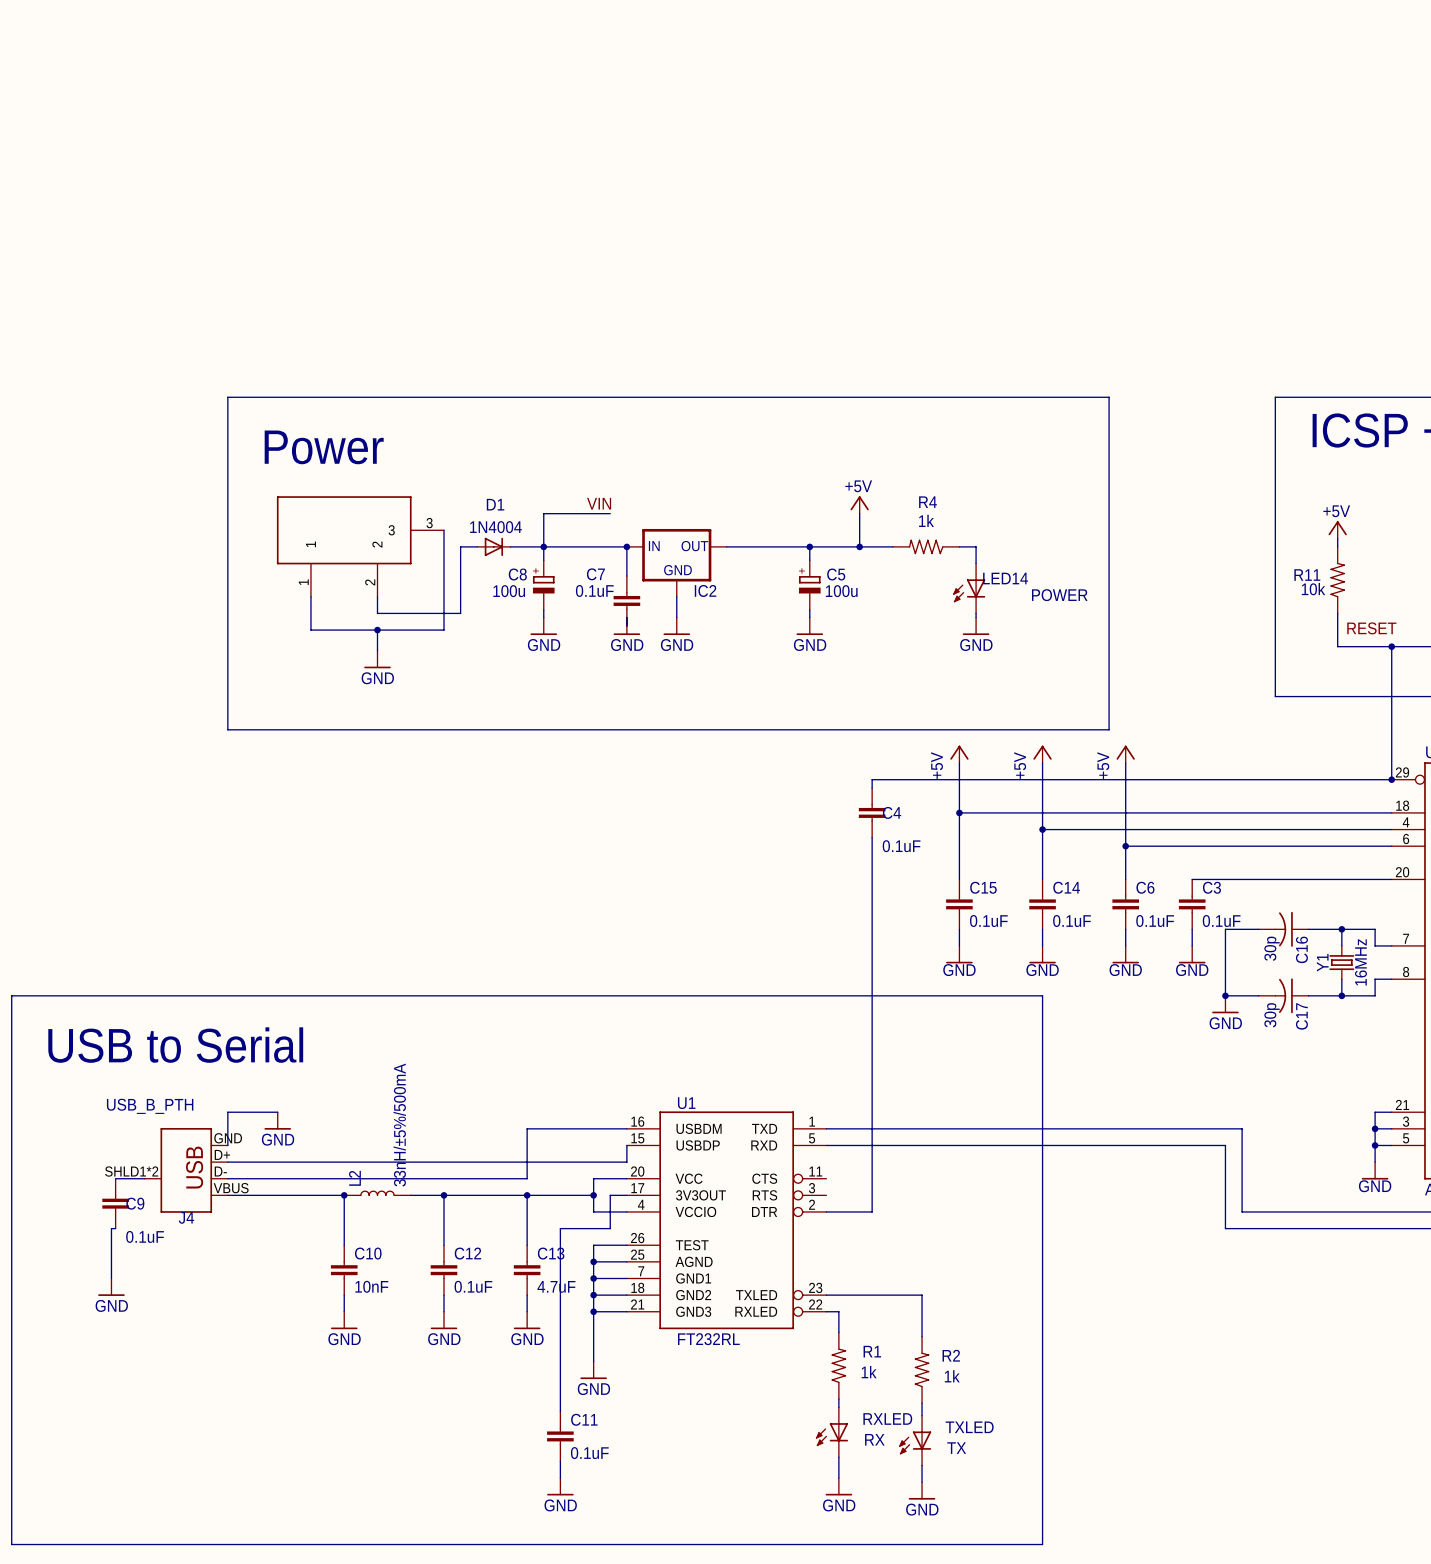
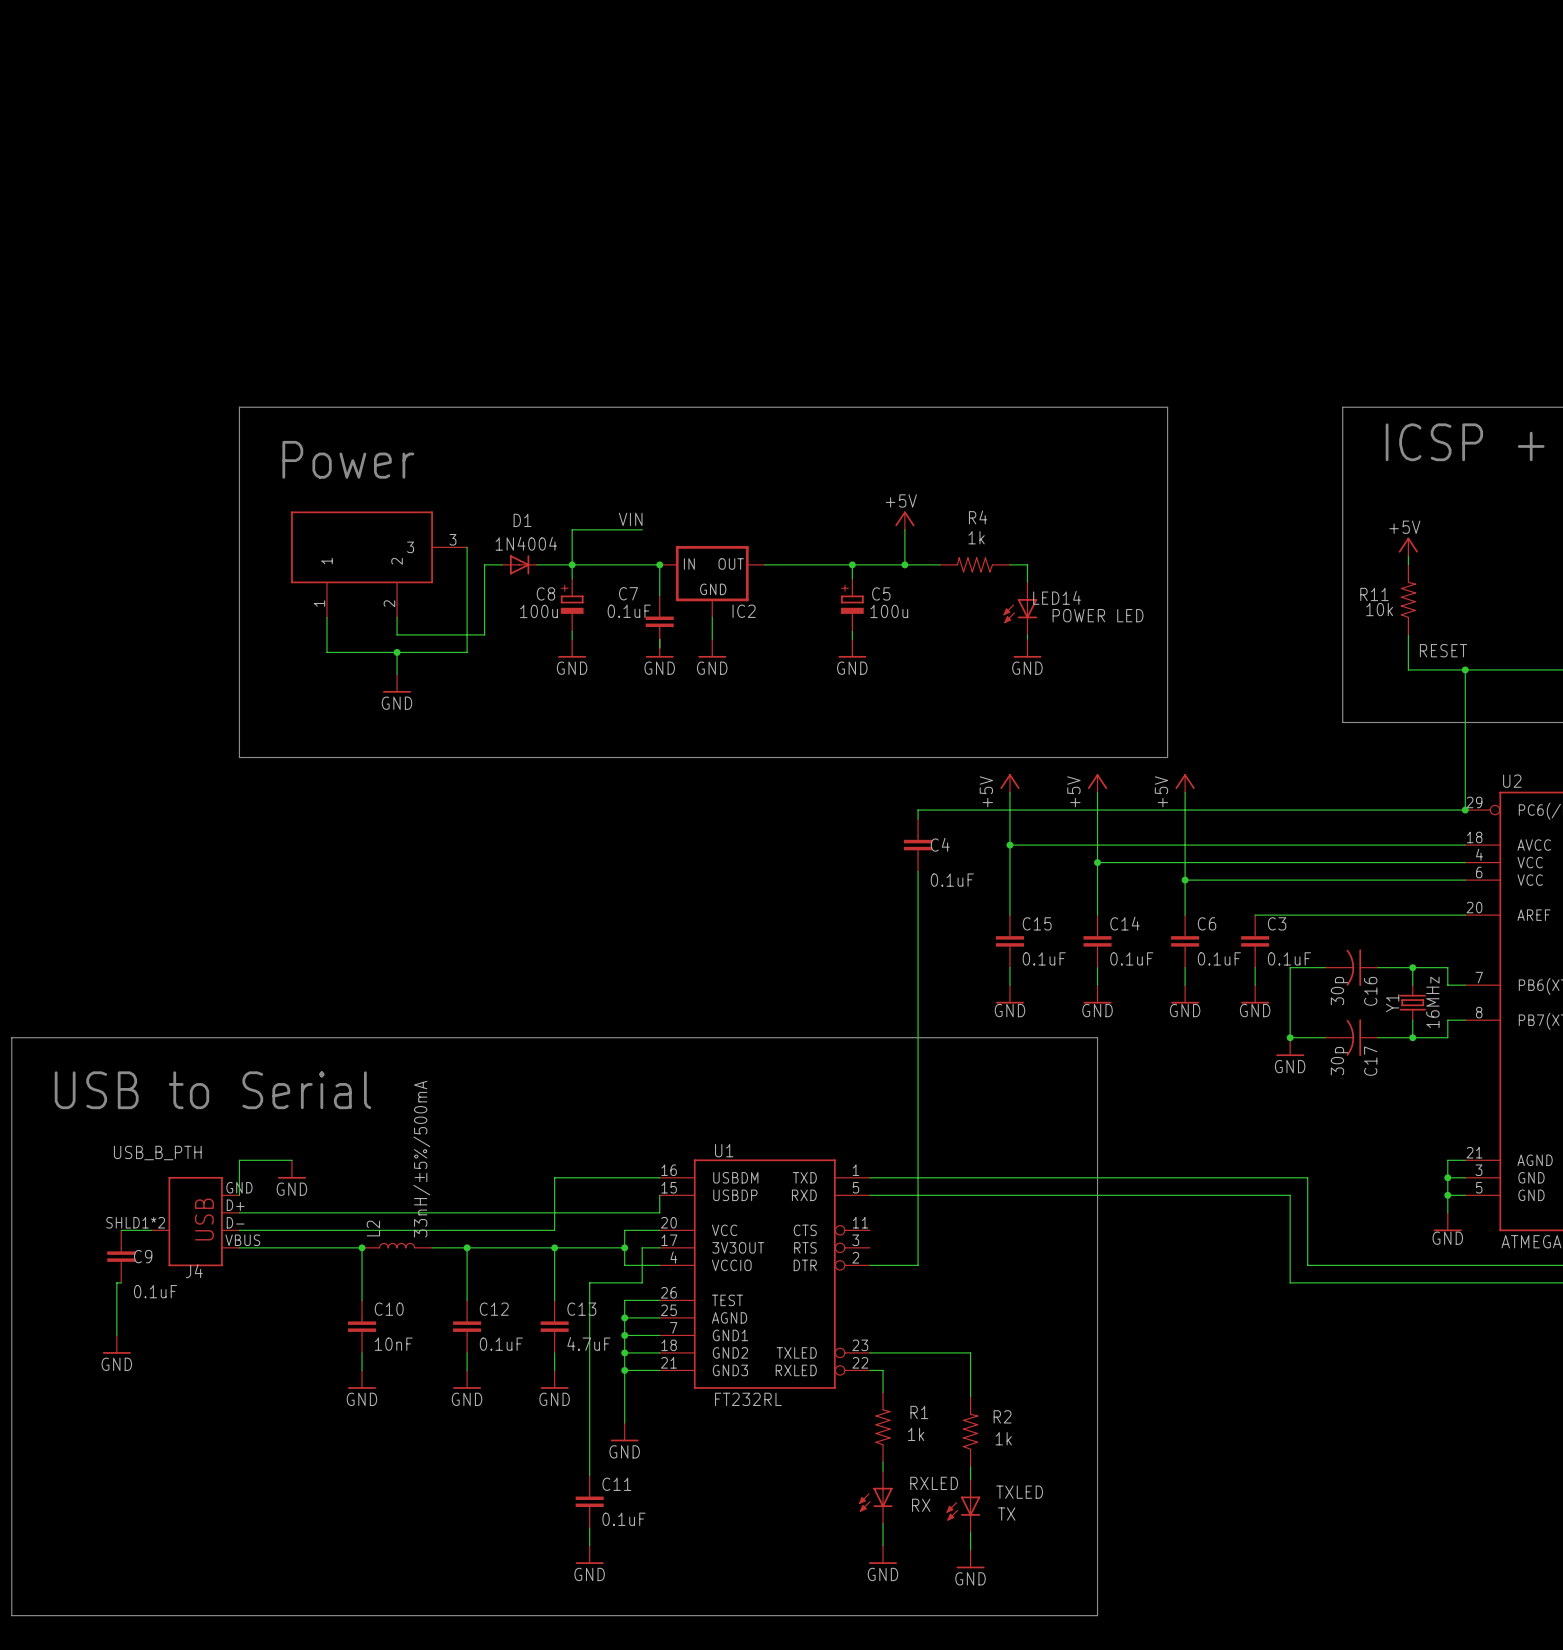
LED14 value: POWER (1059, 595) -> POWER LED (1098, 615)

